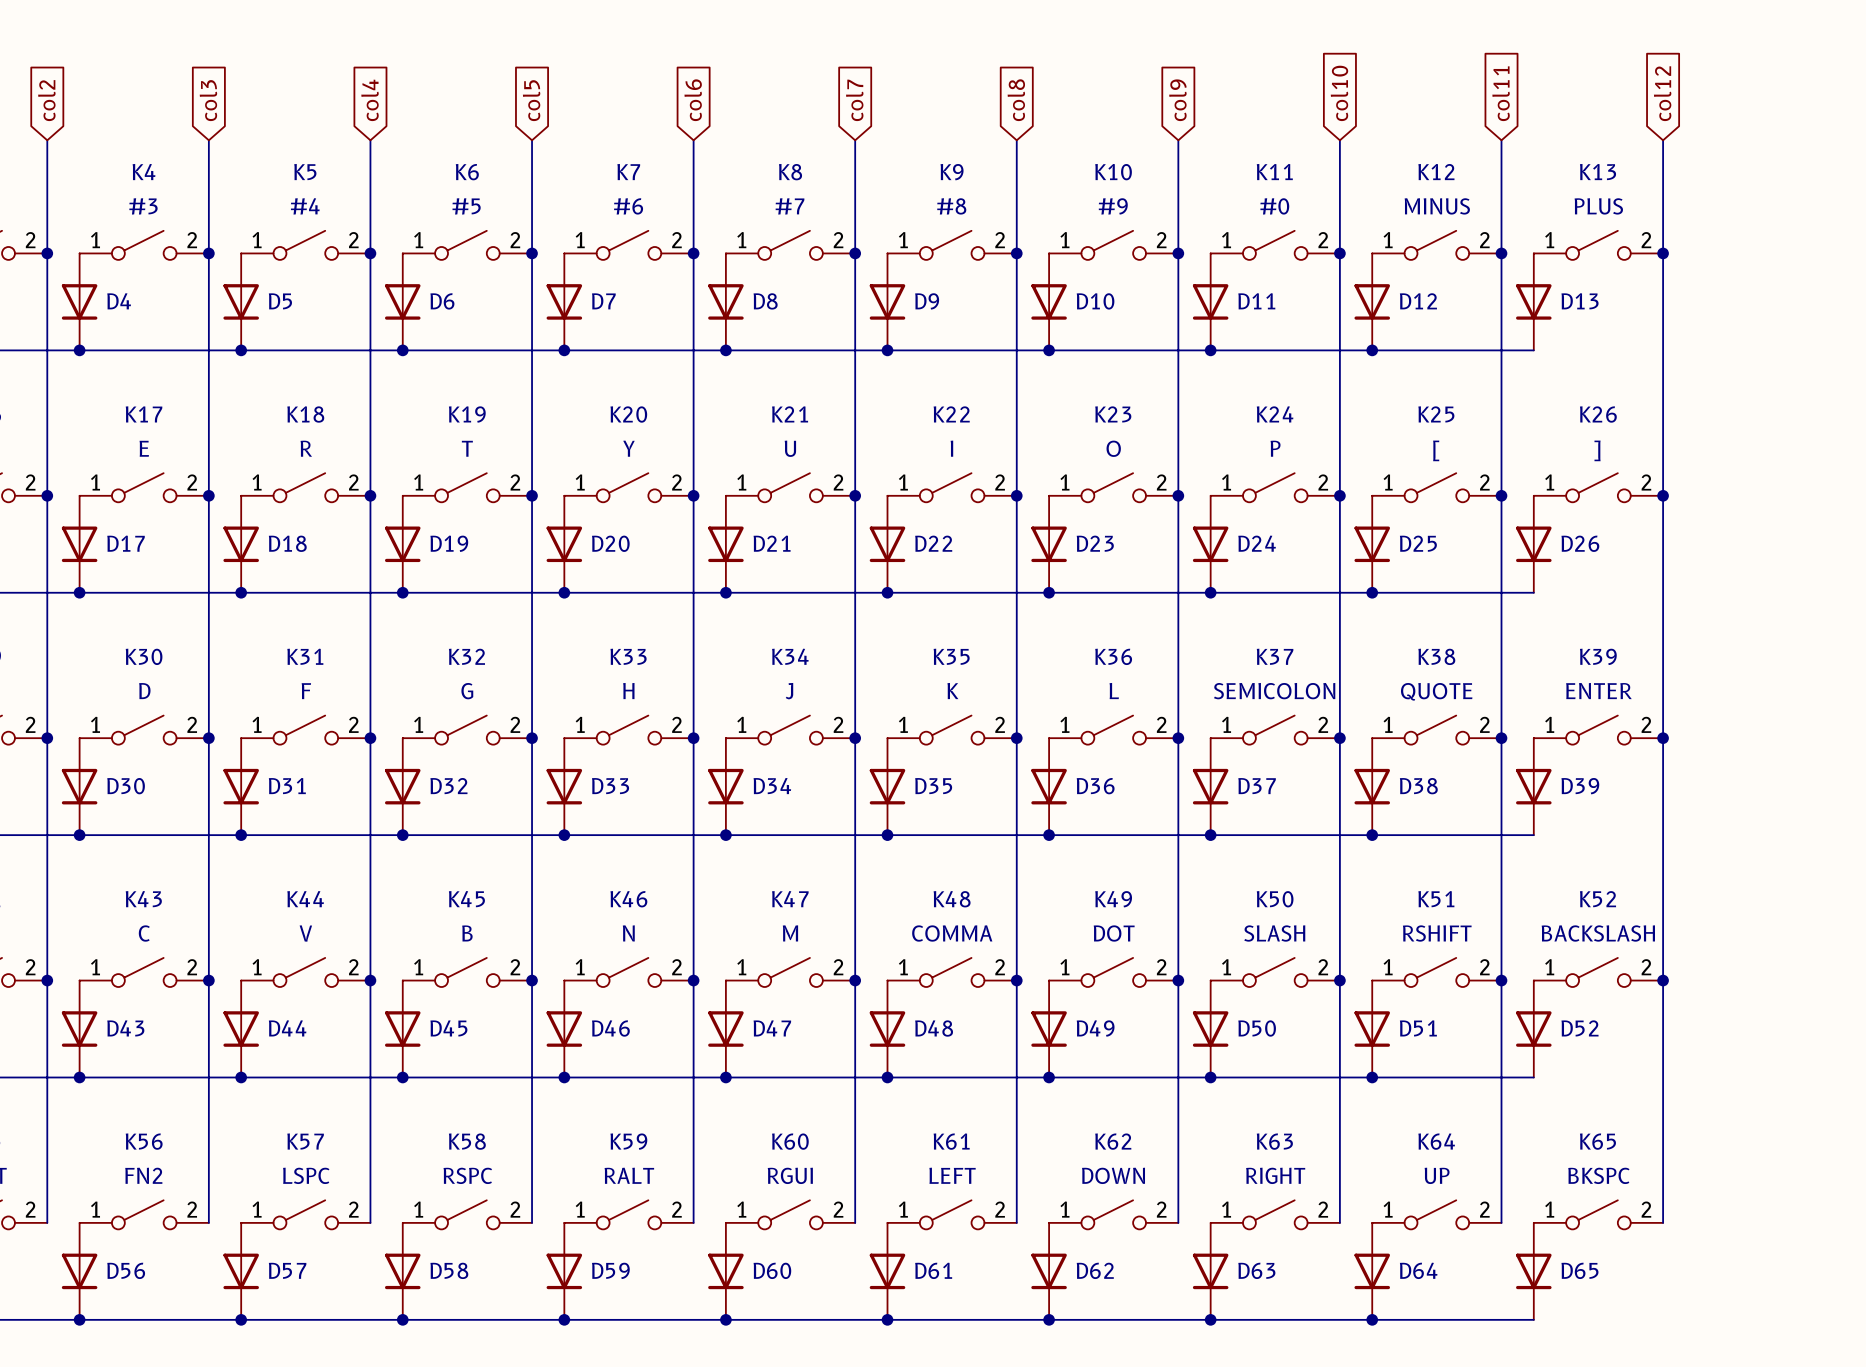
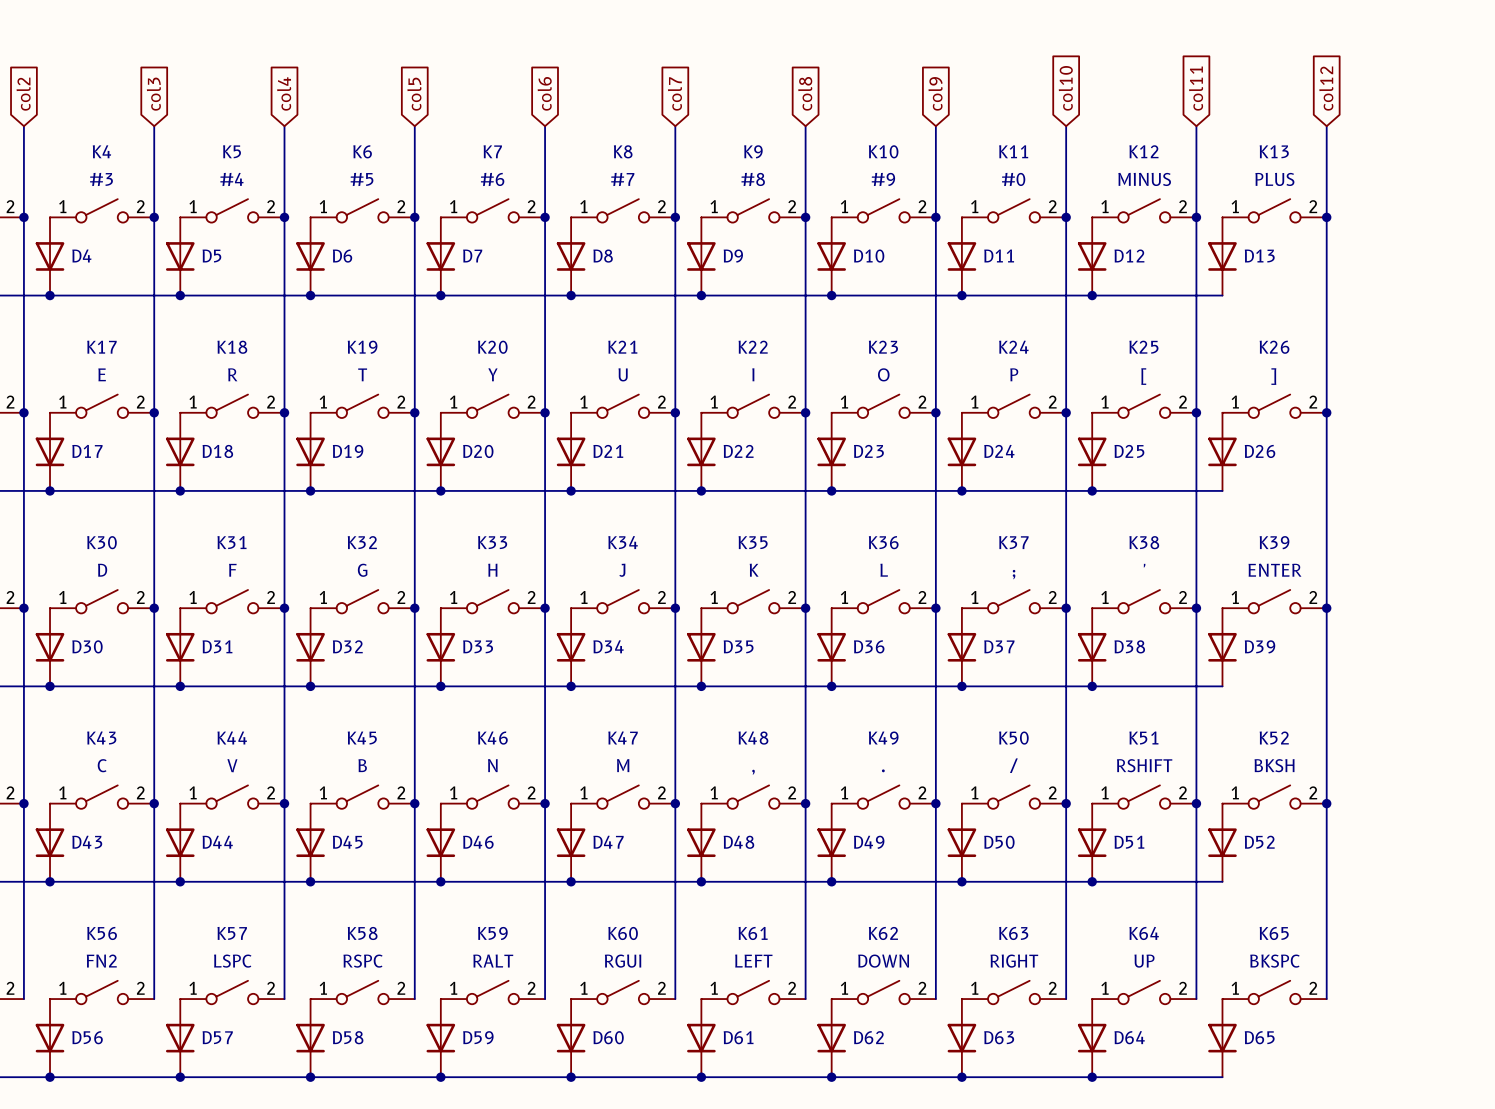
K37 value: SEMICOLON (1274, 691) -> ; (1014, 574)
K38 value: QUOTE (1436, 691) -> ' (1144, 565)
K48 value: COMMA (952, 933) -> , (753, 772)
K49 value: DOT (1114, 933) -> . (883, 770)
K50 value: SLASH (1274, 933) -> / (1013, 765)
K52 value: BACKSLASH (1598, 933) -> BKSH (1274, 765)

